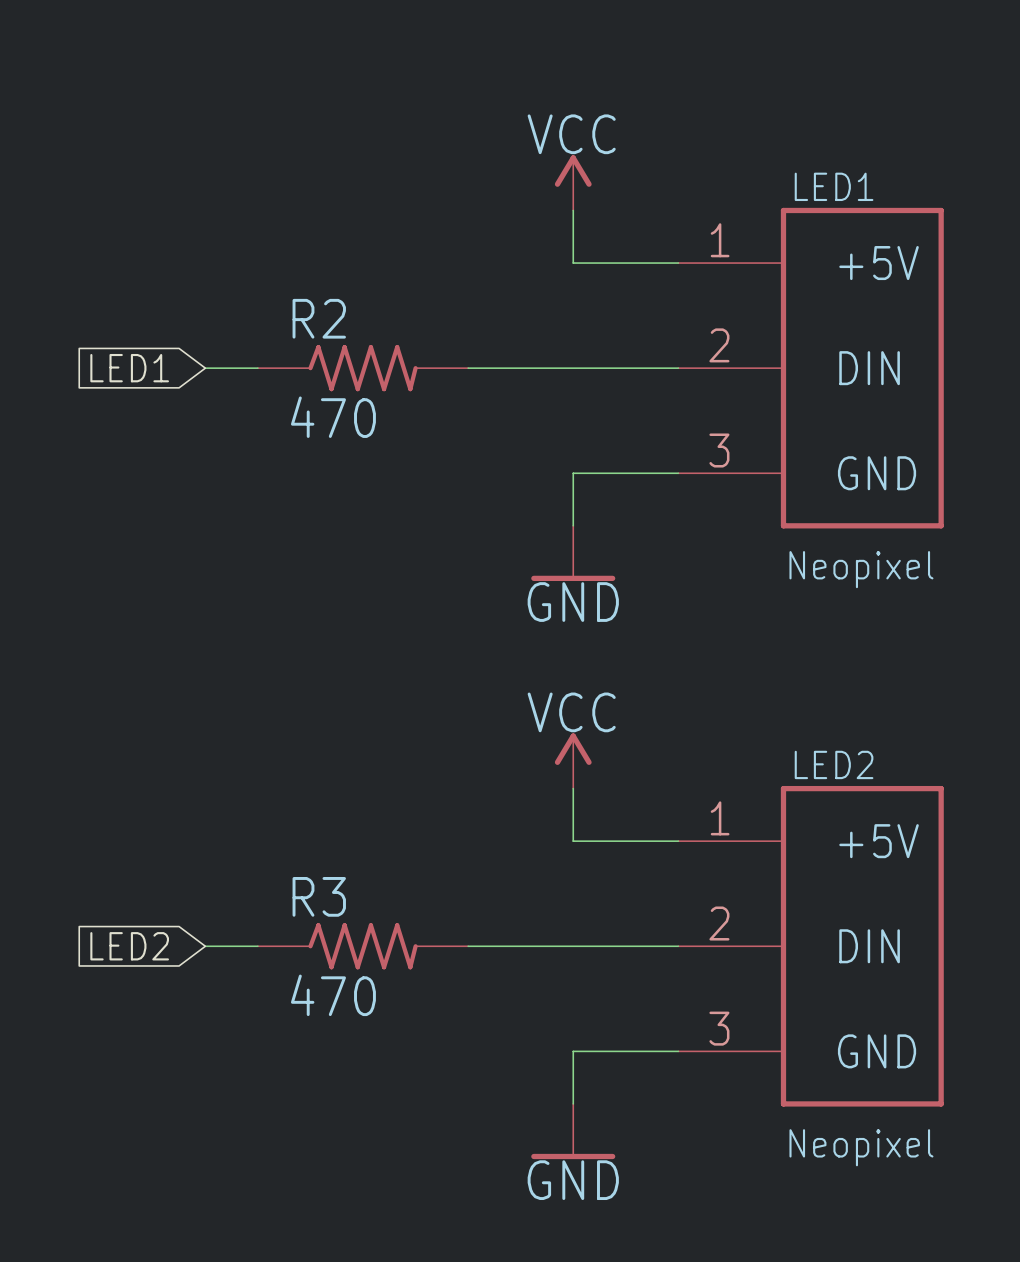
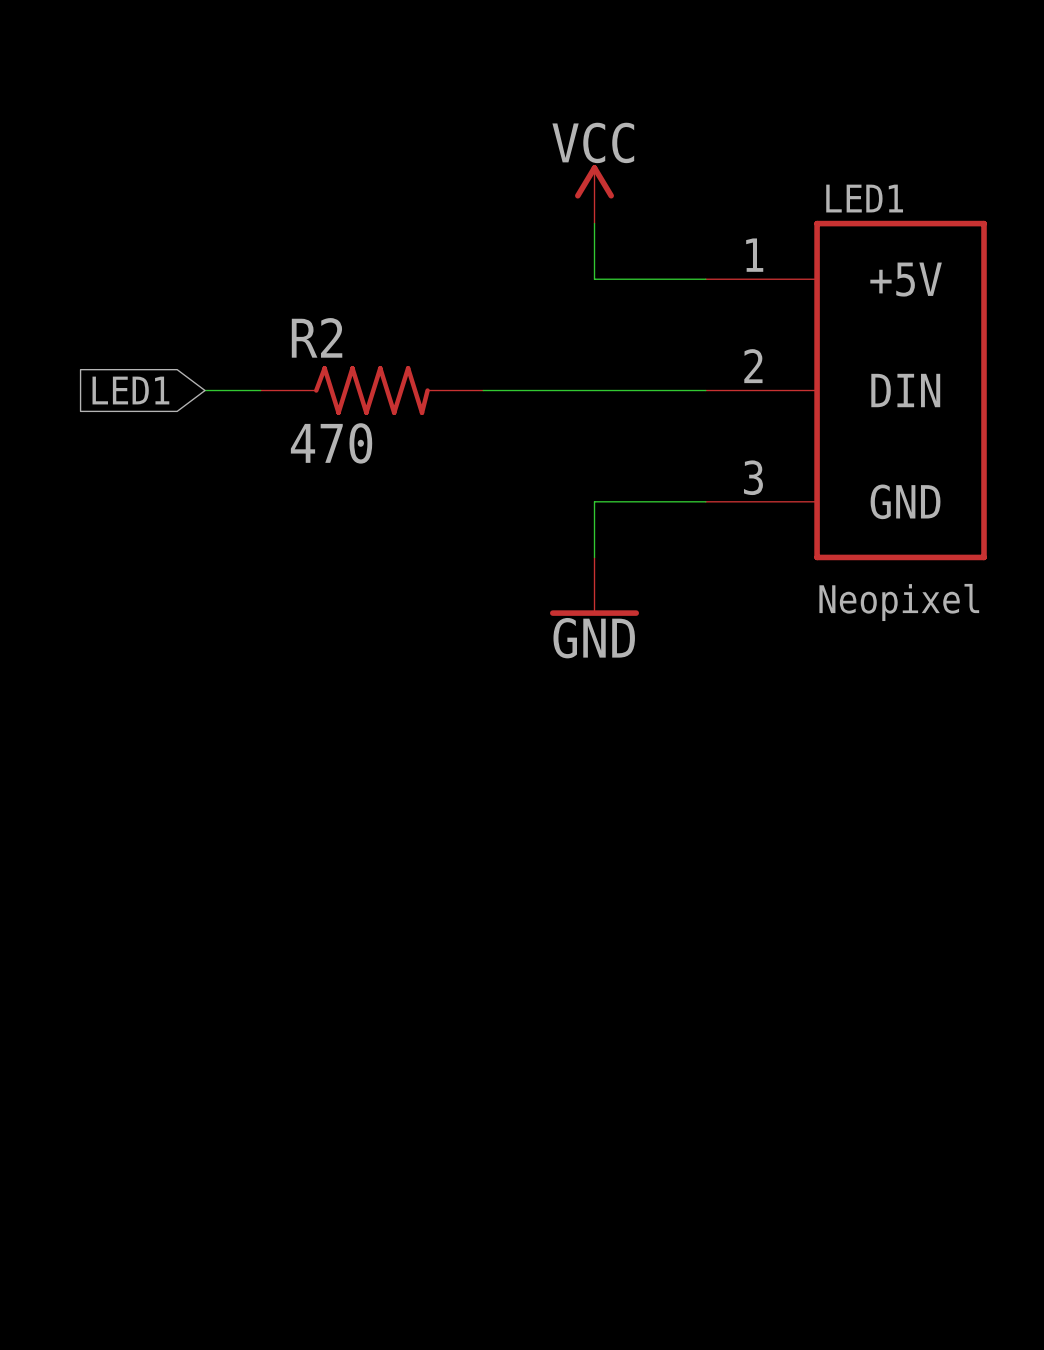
power symbol: VCC (573, 761) -> none
wire: (573, 788) (573, 841) (678, 841) -> none
global label: LED2 (129, 946) -> none
wire: (205, 946) (257, 946) -> none
R3: 470 (363, 946) -> none
wire: (468, 946) (678, 946) -> none
LED2: Neopixel (811, 946) -> none
wire: (678, 1051) (573, 1051) (573, 1103) -> none
power symbol: GND (573, 1131) -> none

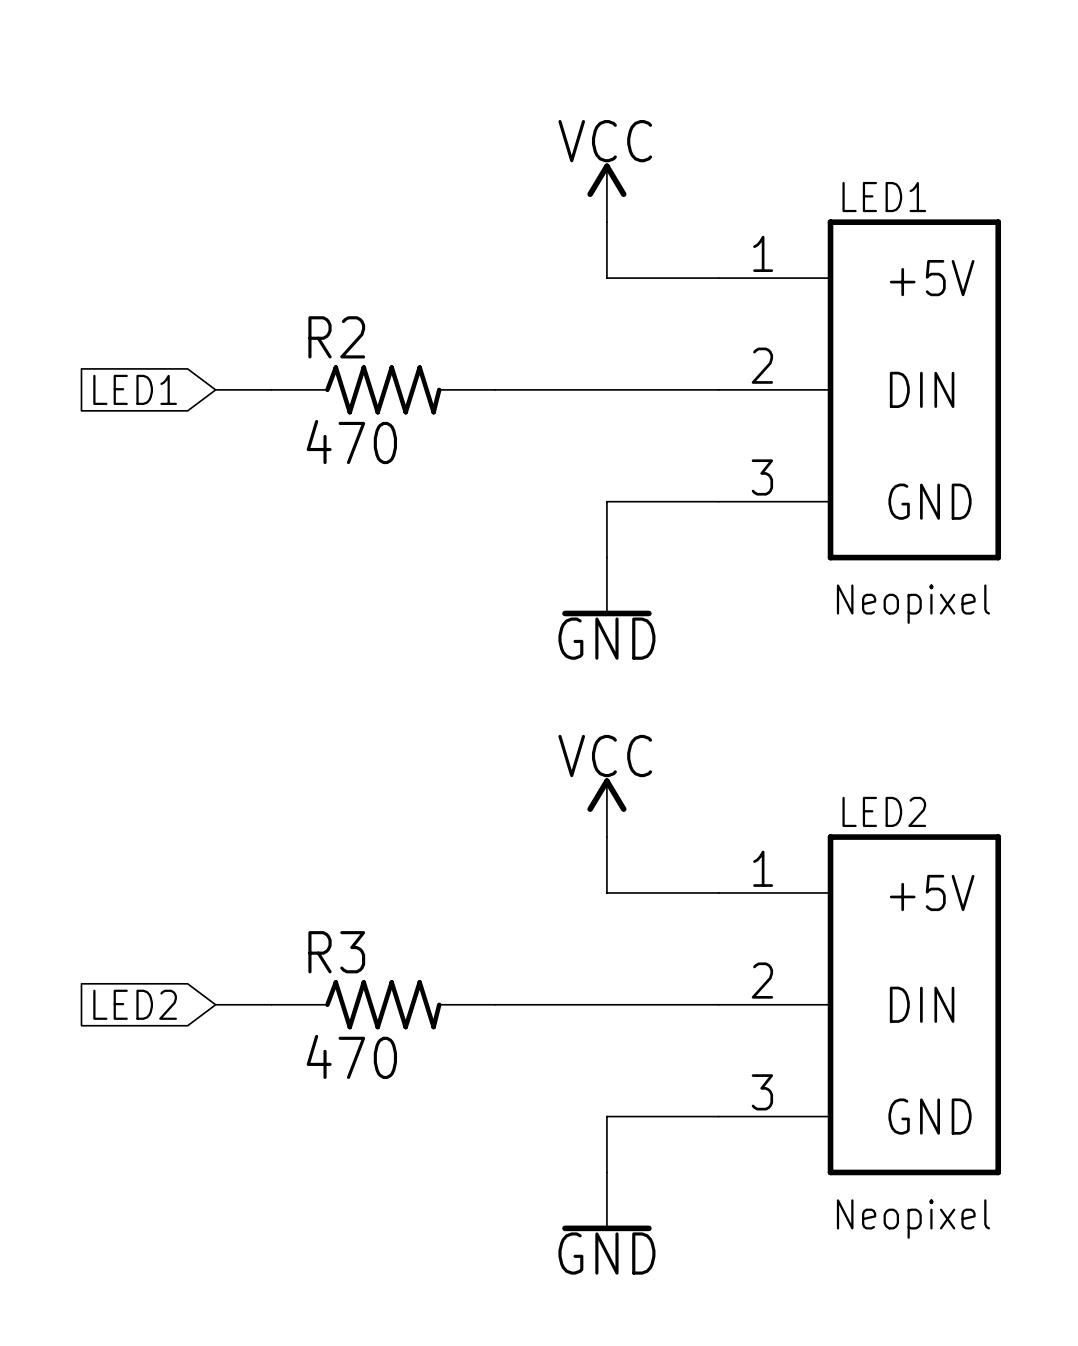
power symbol: none -> VCC (606, 807)
wire: none -> (606, 837) (606, 892) (718, 892)
global label: none -> LED2 (135, 1004)
wire: none -> (215, 1004) (271, 1004)
R3: none -> 470 (383, 1004)
wire: none -> (495, 1004) (718, 1004)
LED2: none -> Neopixel (859, 1004)
wire: none -> (718, 1116) (606, 1116) (606, 1172)
power symbol: none -> GND (606, 1201)

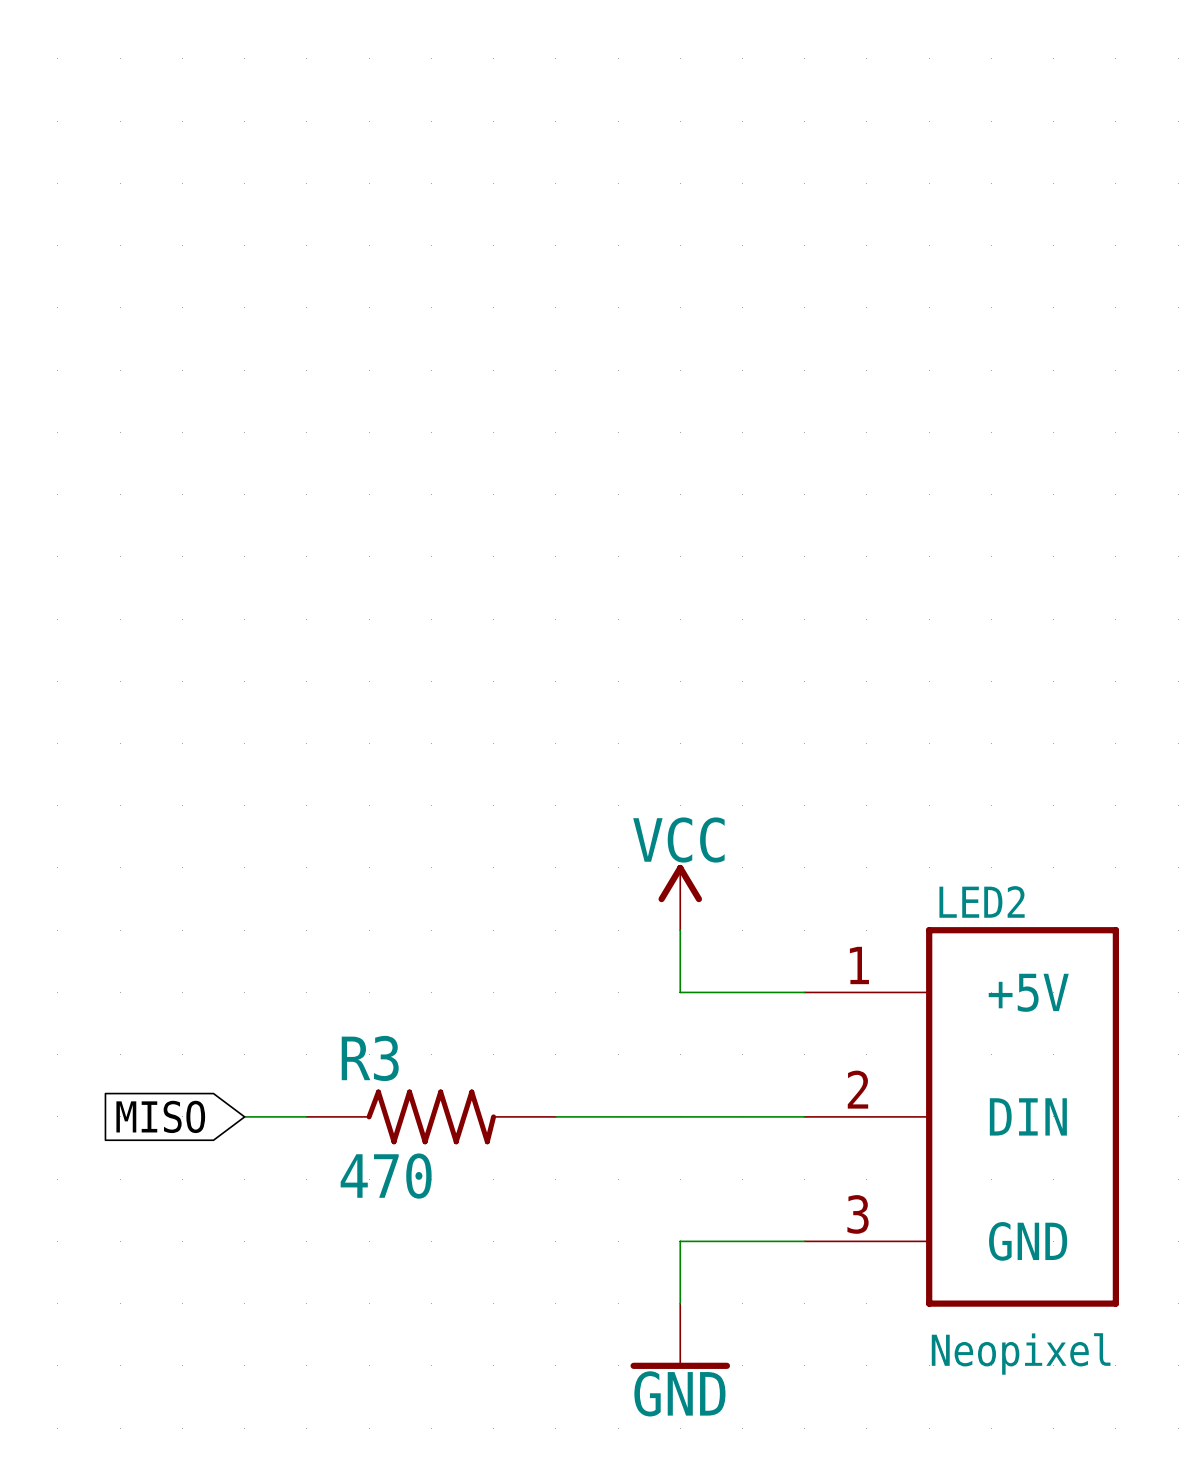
power symbol: VCC (606, 192) -> none
wire: (606, 222) (606, 278) (718, 278) -> none
global label: LED1 (135, 389) -> none
wire: (215, 389) (271, 389) -> none
R2: 470 (383, 389) -> none
wire: (495, 389) (718, 389) -> none
LED1: Neopixel (859, 389) -> none
wire: (718, 501) (606, 501) (606, 557) -> none
power symbol: GND (606, 586) -> none
global label: LED2 (135, 1004) -> MISO (160, 1116)

